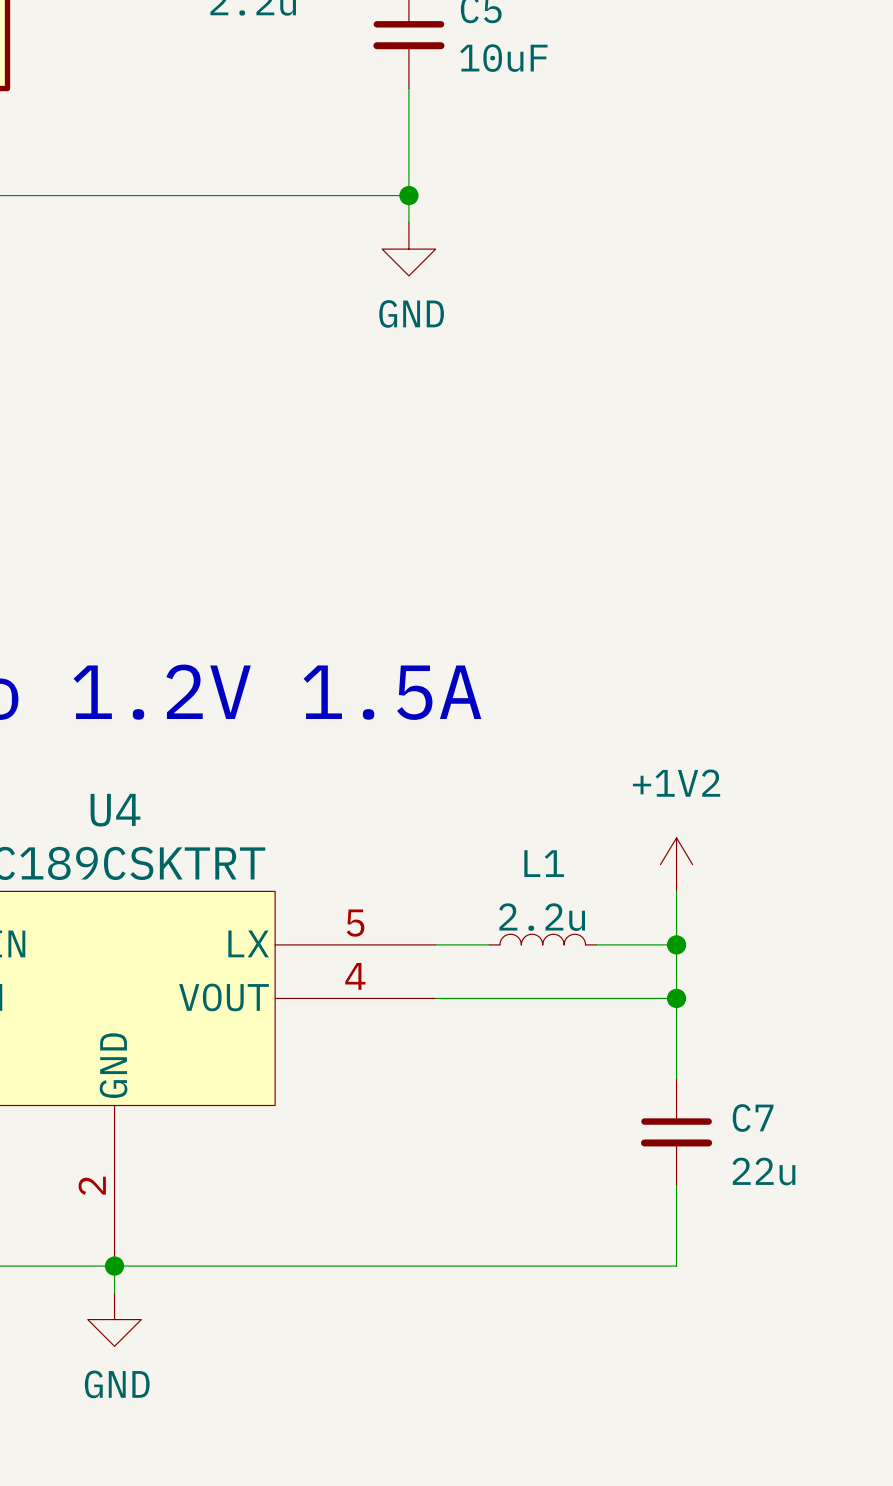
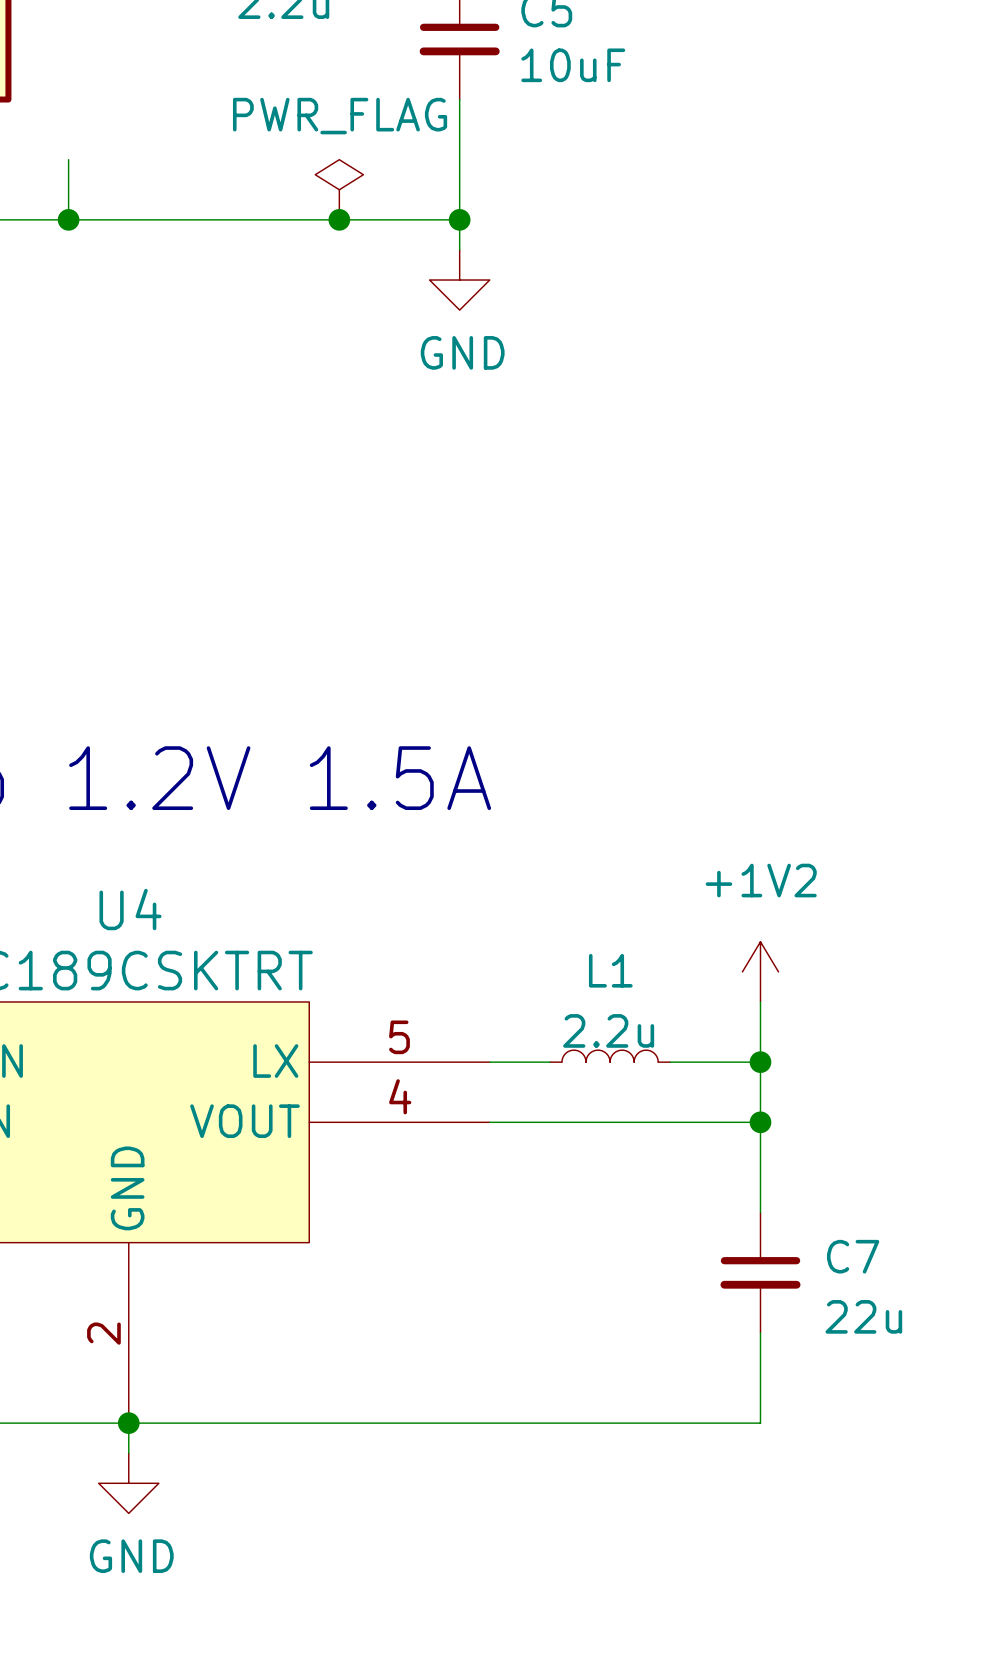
wire: none -> (68, 159) (68, 219)
power symbol: none -> PWR_FLAG (339, 189)
junction: none -> (68, 219)
junction: none -> (339, 219)

